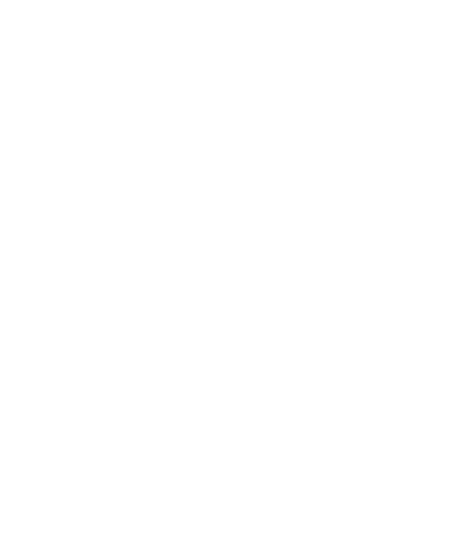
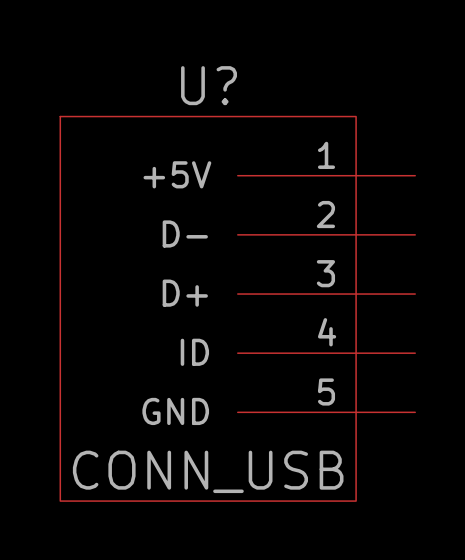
U?: none -> CONN_USB (237, 308)

